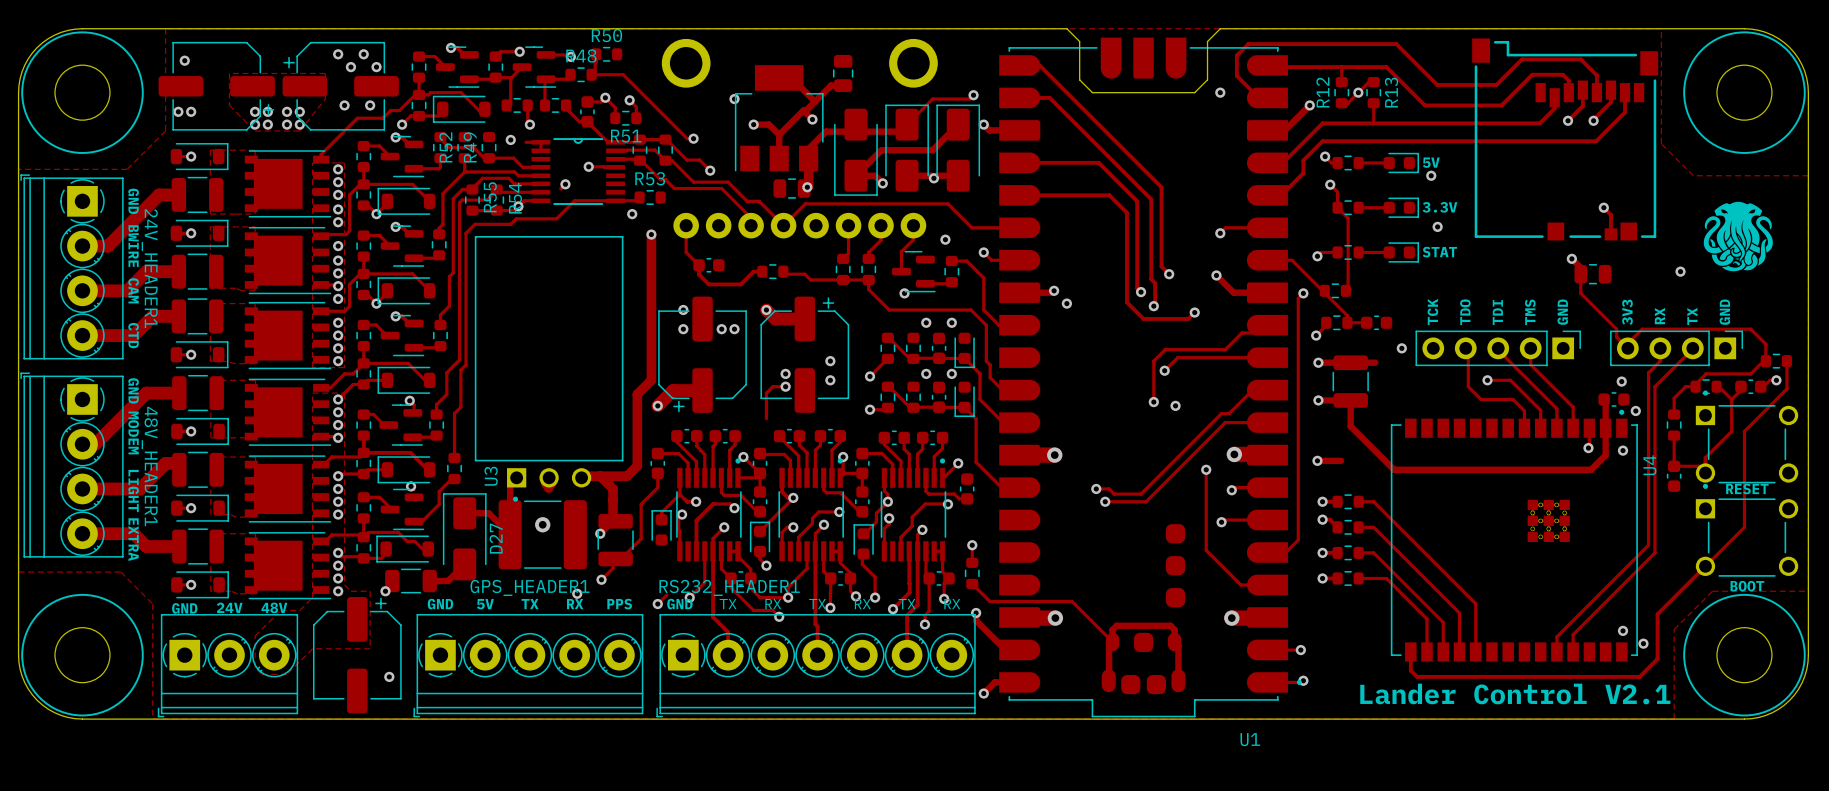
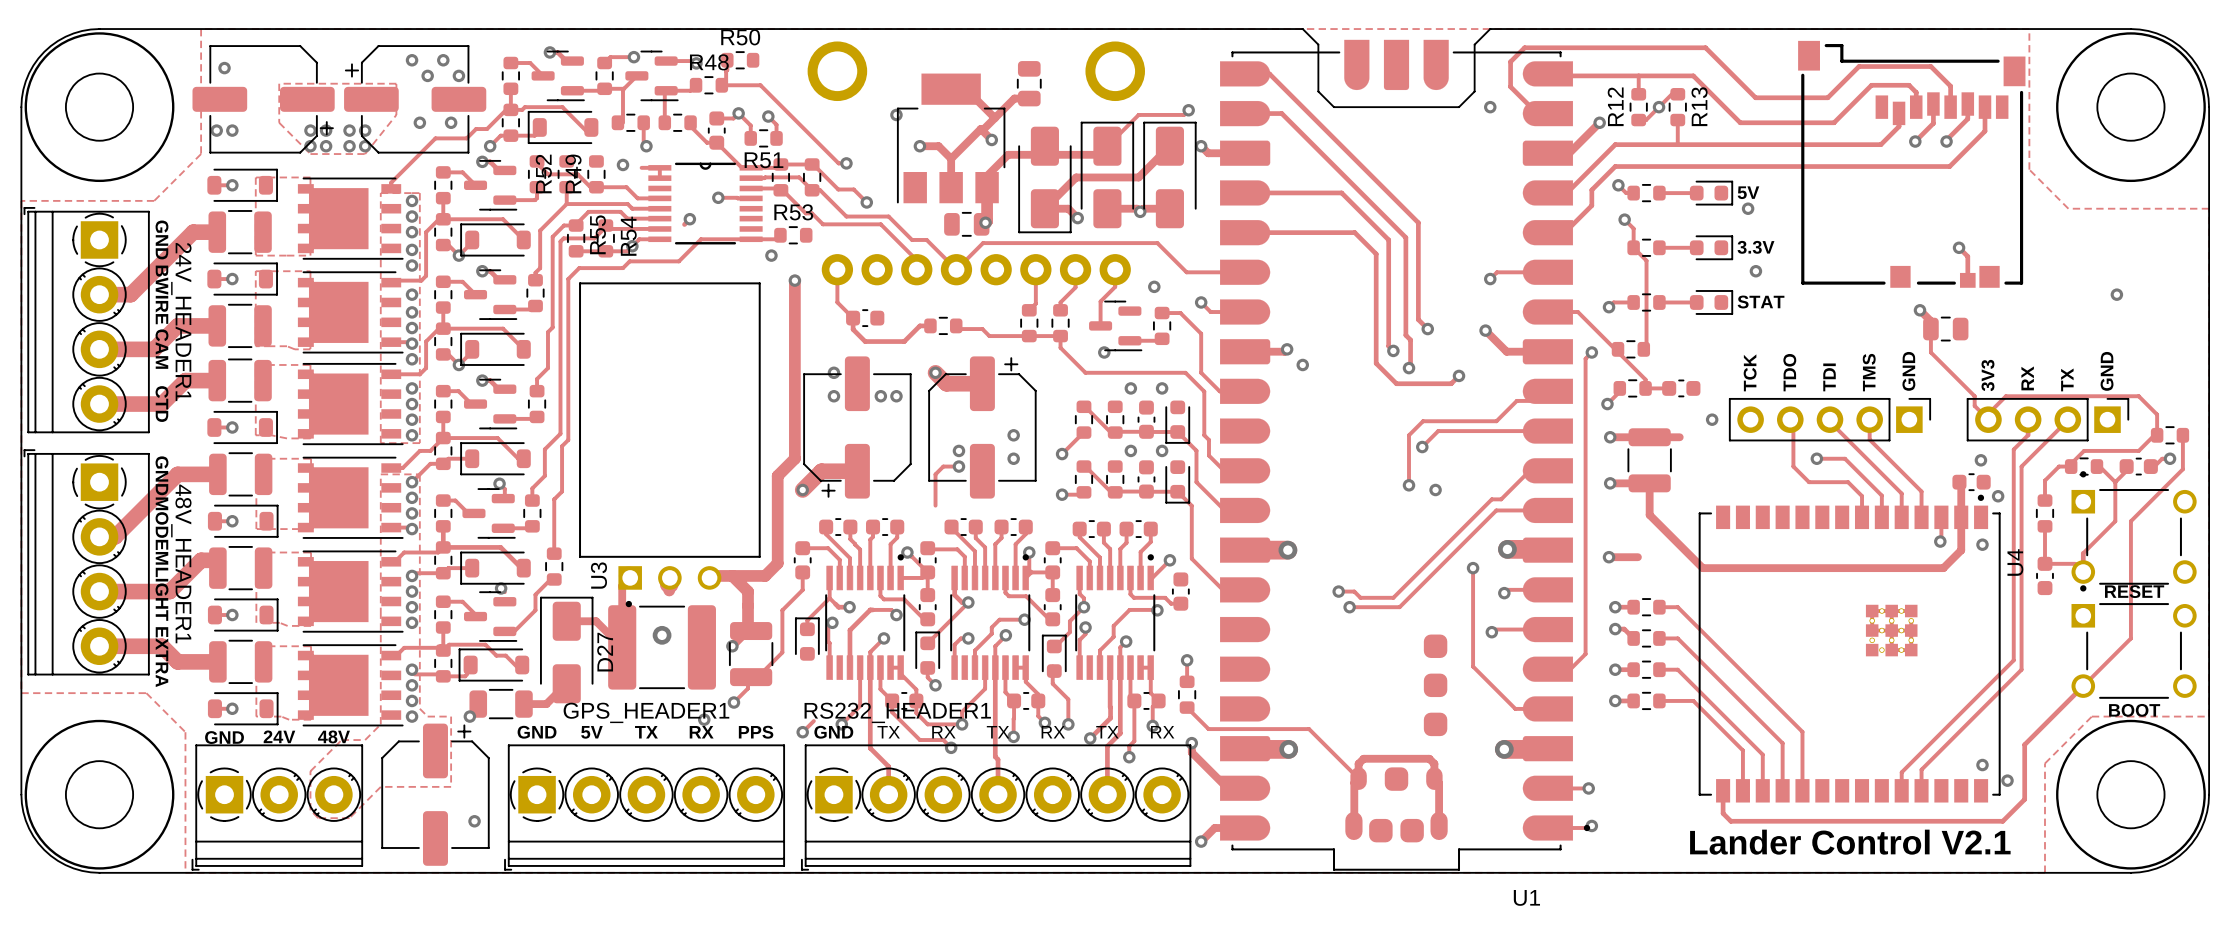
drawing: [1703, 201, 1773, 272] -> none
via position: (1680, 271) -> (2116, 294)

